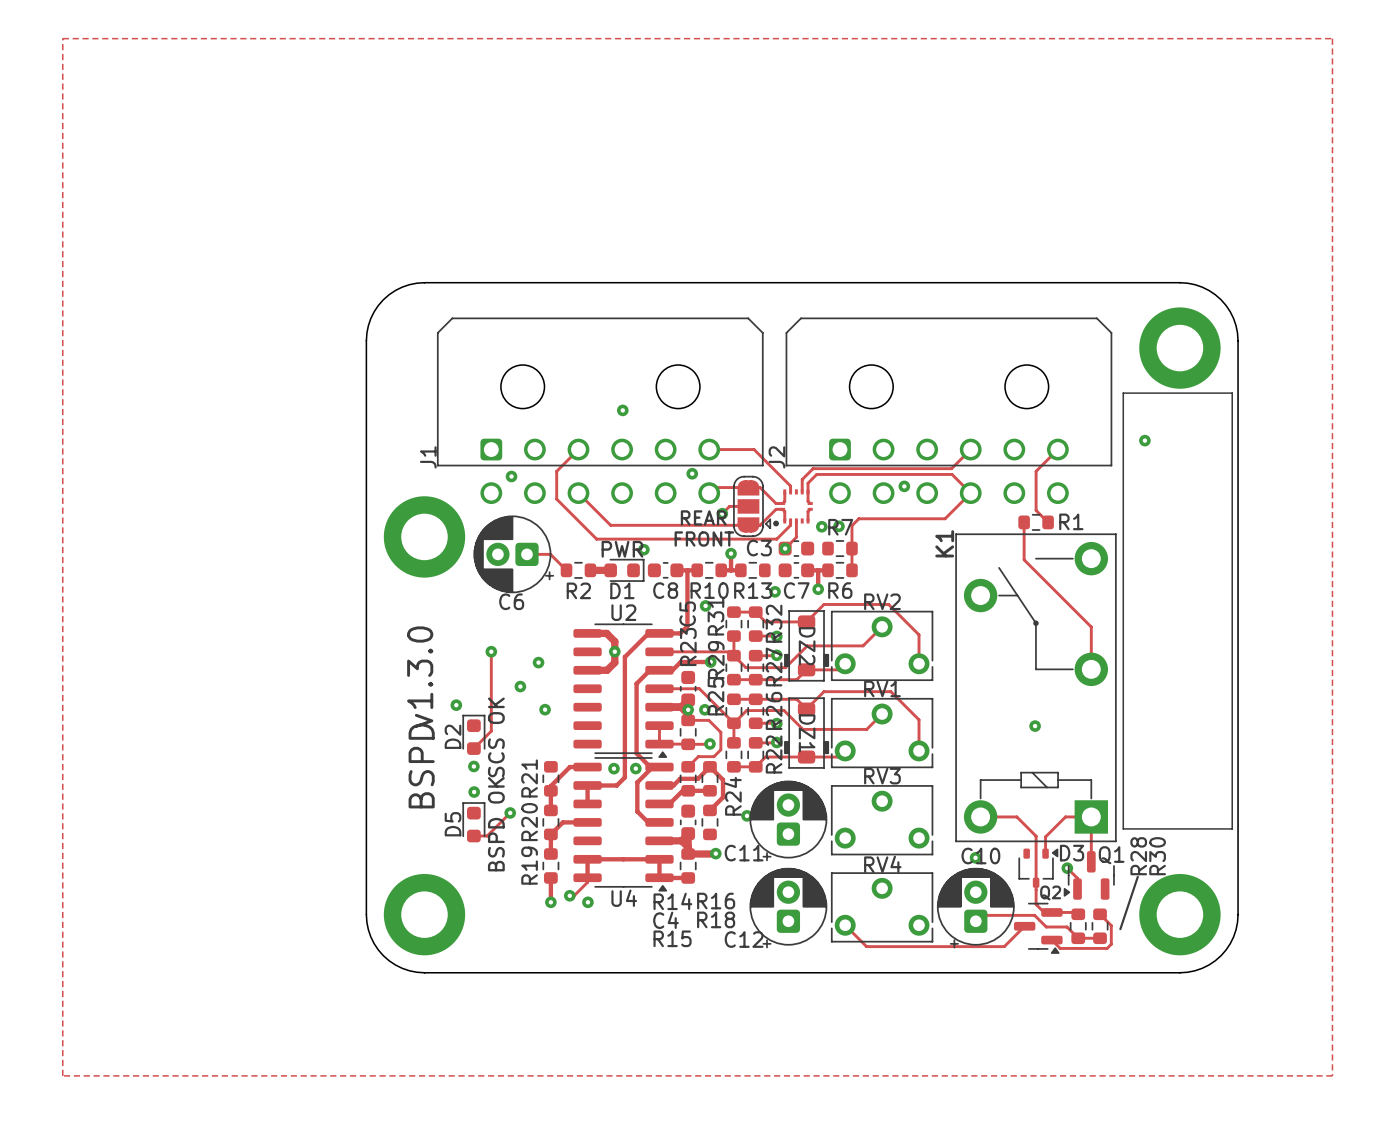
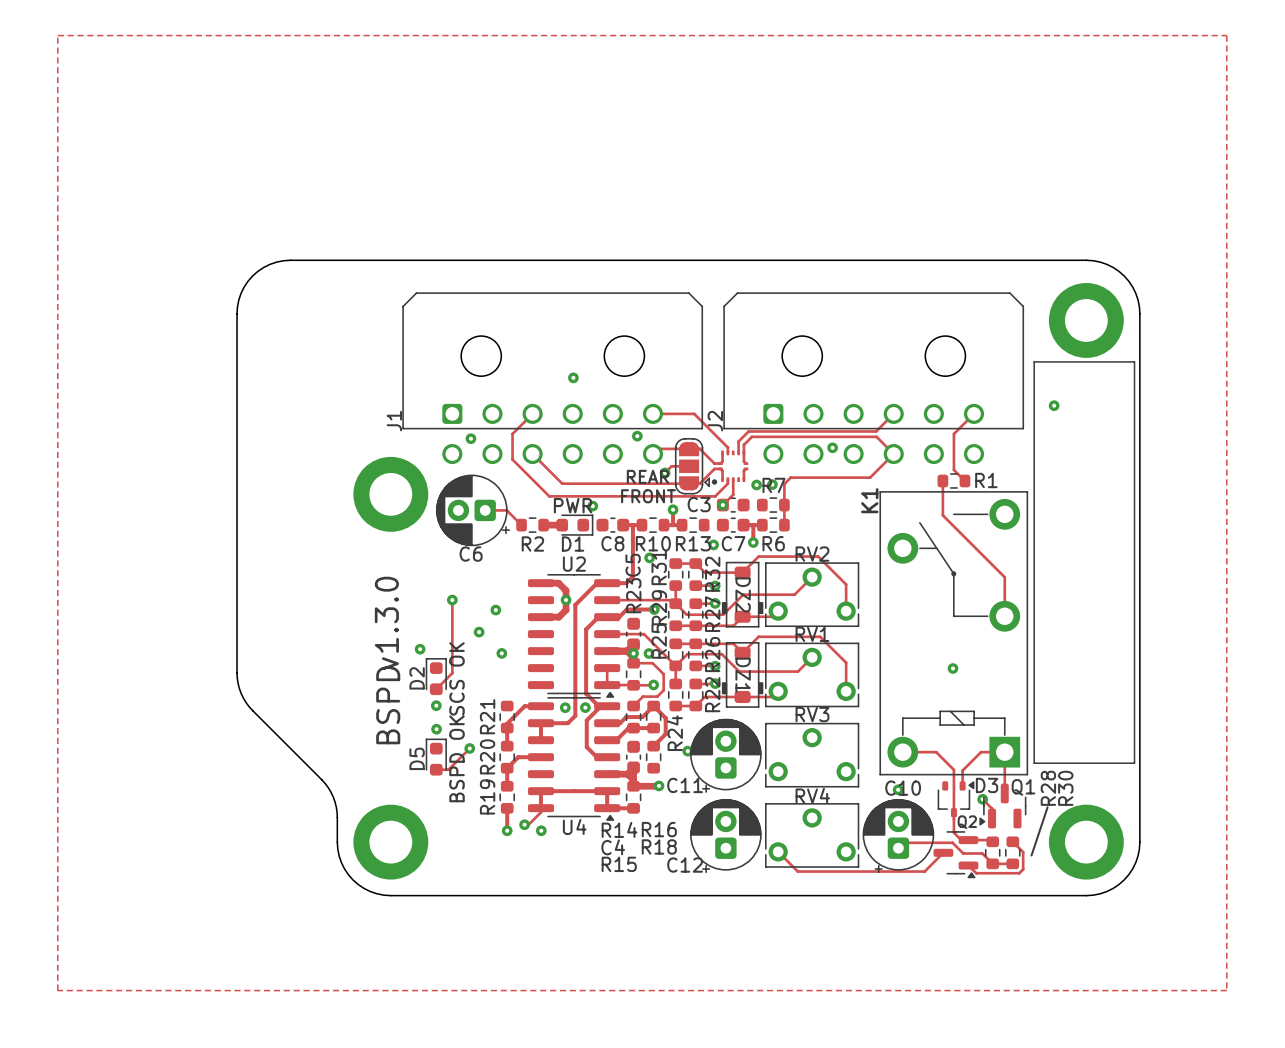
board edge: (424, 282) (409, 284) (389, 294) (374, 311) (366, 333) (366, 887) -> (390, 260) (290, 260) (276, 262) (257, 271) (248, 281) (241, 293) (237, 306) (238, 683) (241, 693) (249, 706) (328, 787) (335, 801) (337, 817)

